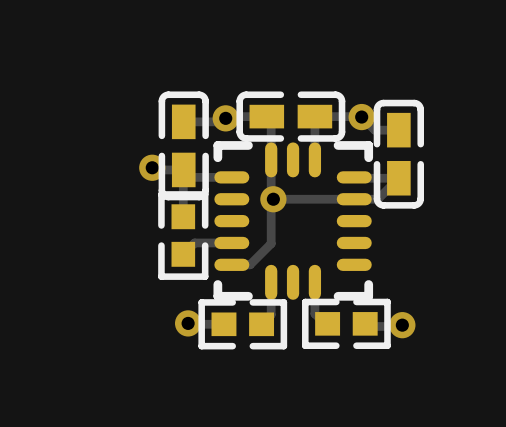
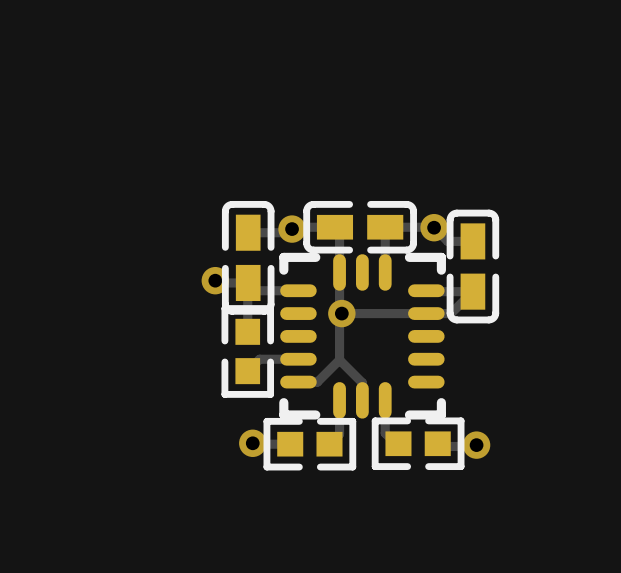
track: none -> (339, 359) (362, 382) (362, 400)

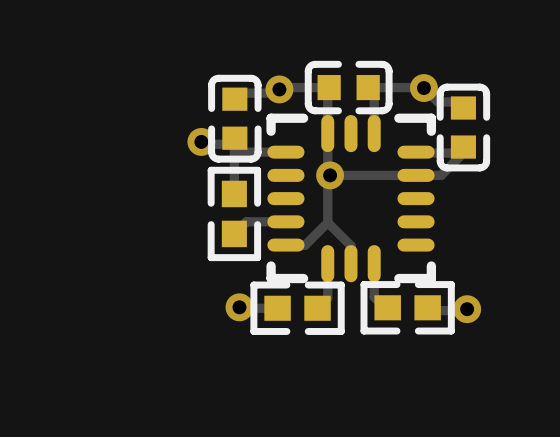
part footprint: [221, 200, 275, 315] -> [208, 74, 262, 163]
part footprint: [303, 200, 417, 254] -> [304, 60, 393, 115]
part footprint: [446, 209, 500, 324] -> [436, 83, 491, 172]

